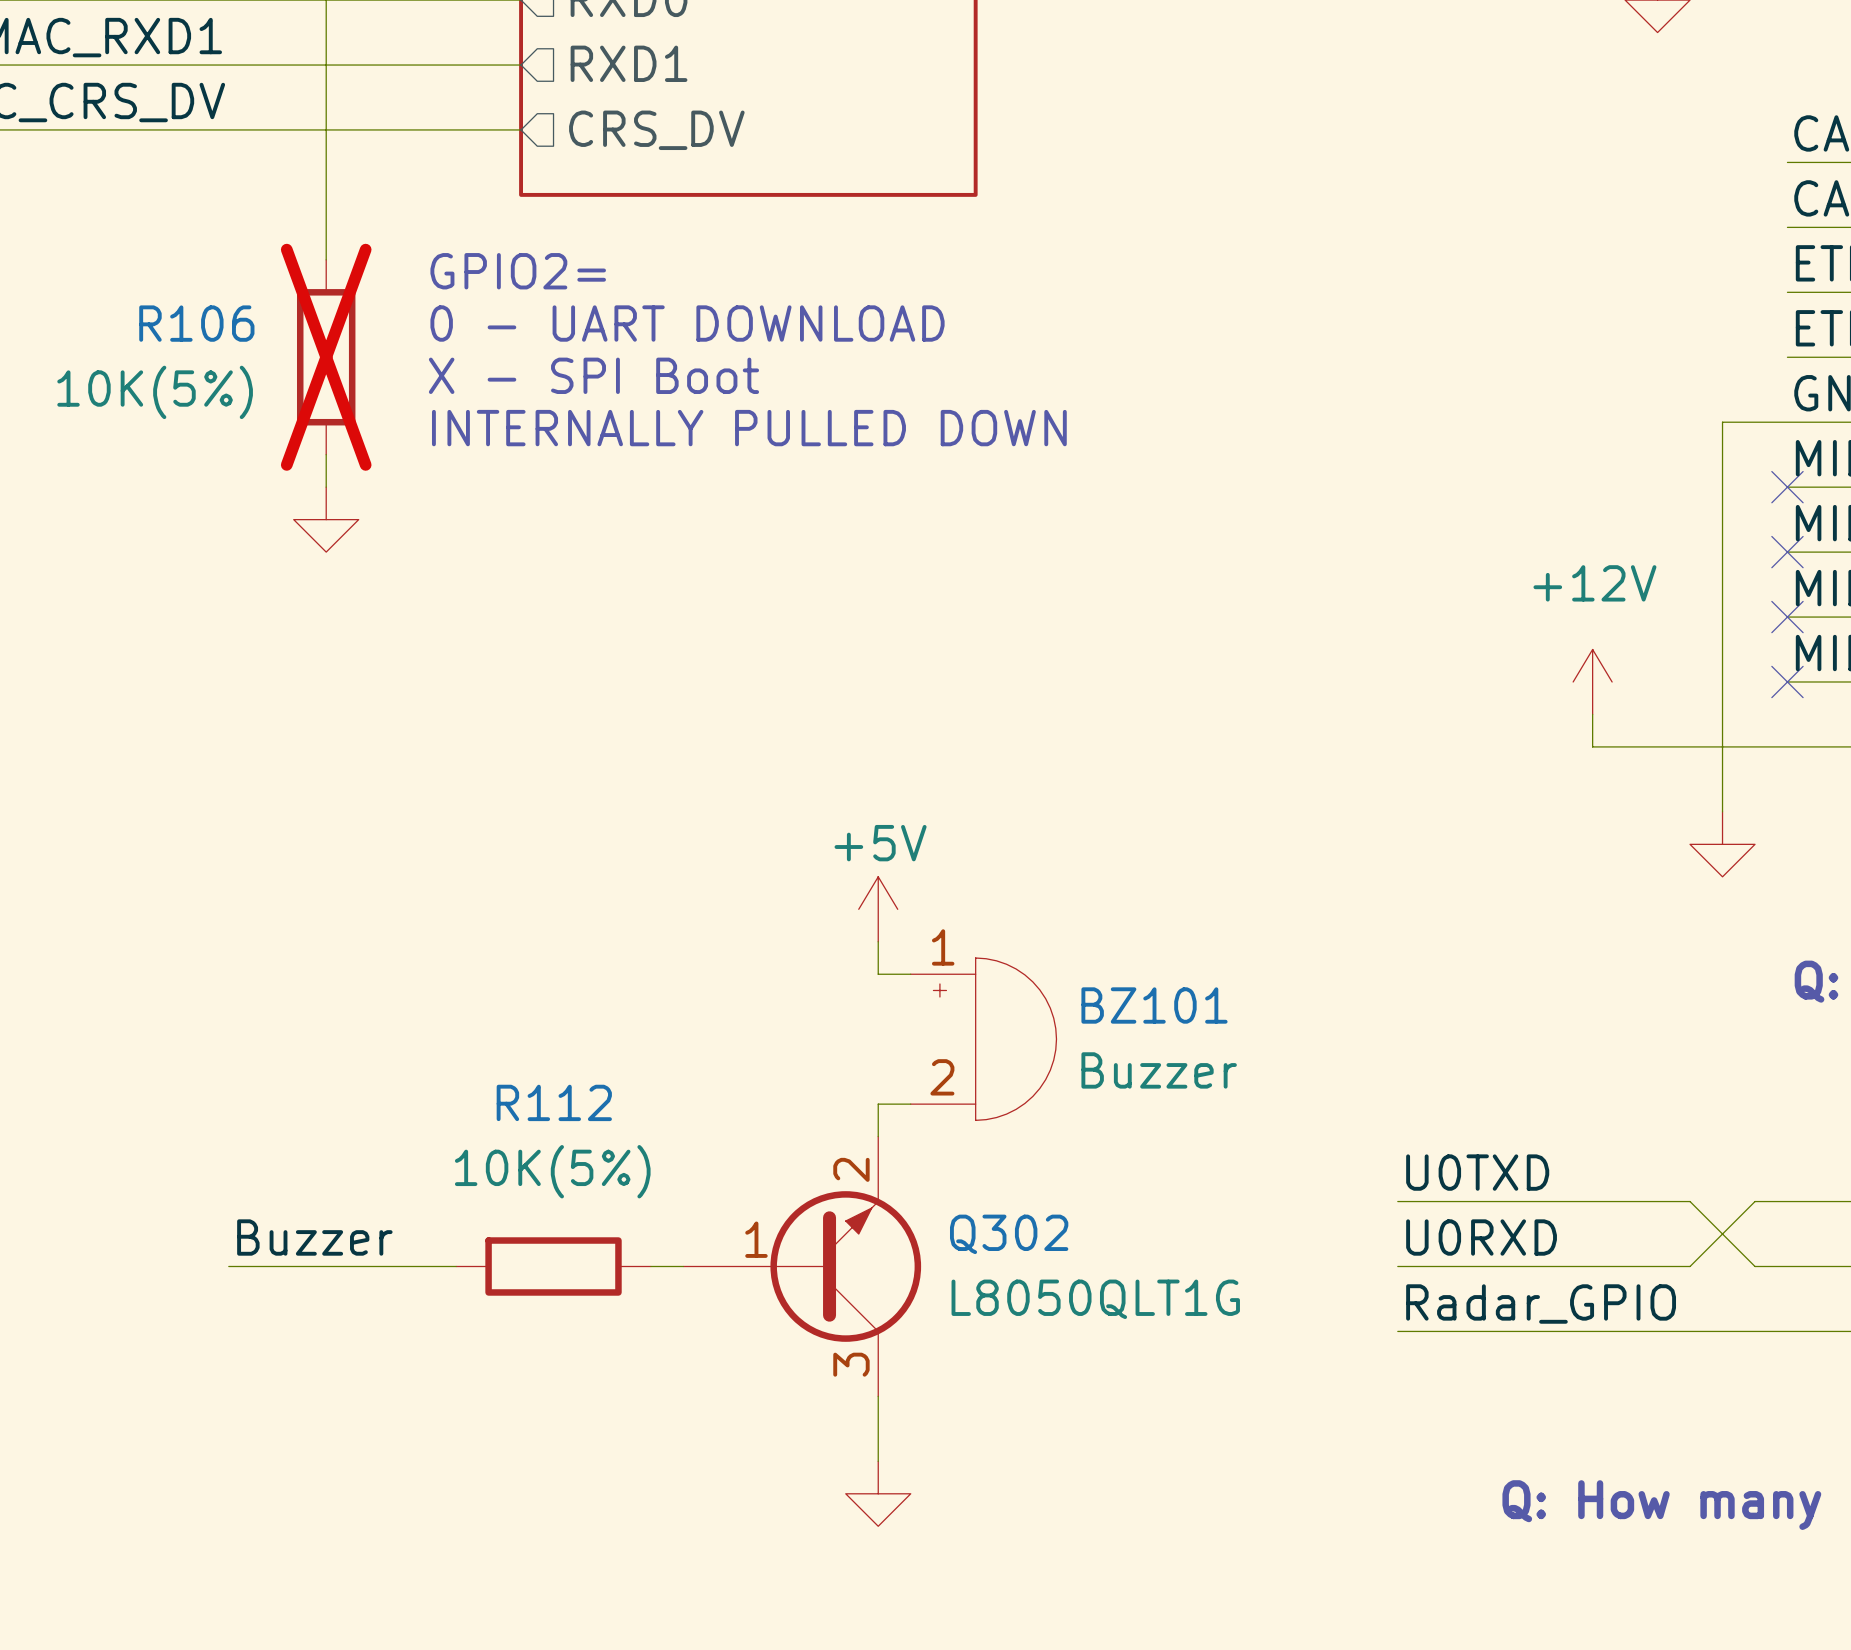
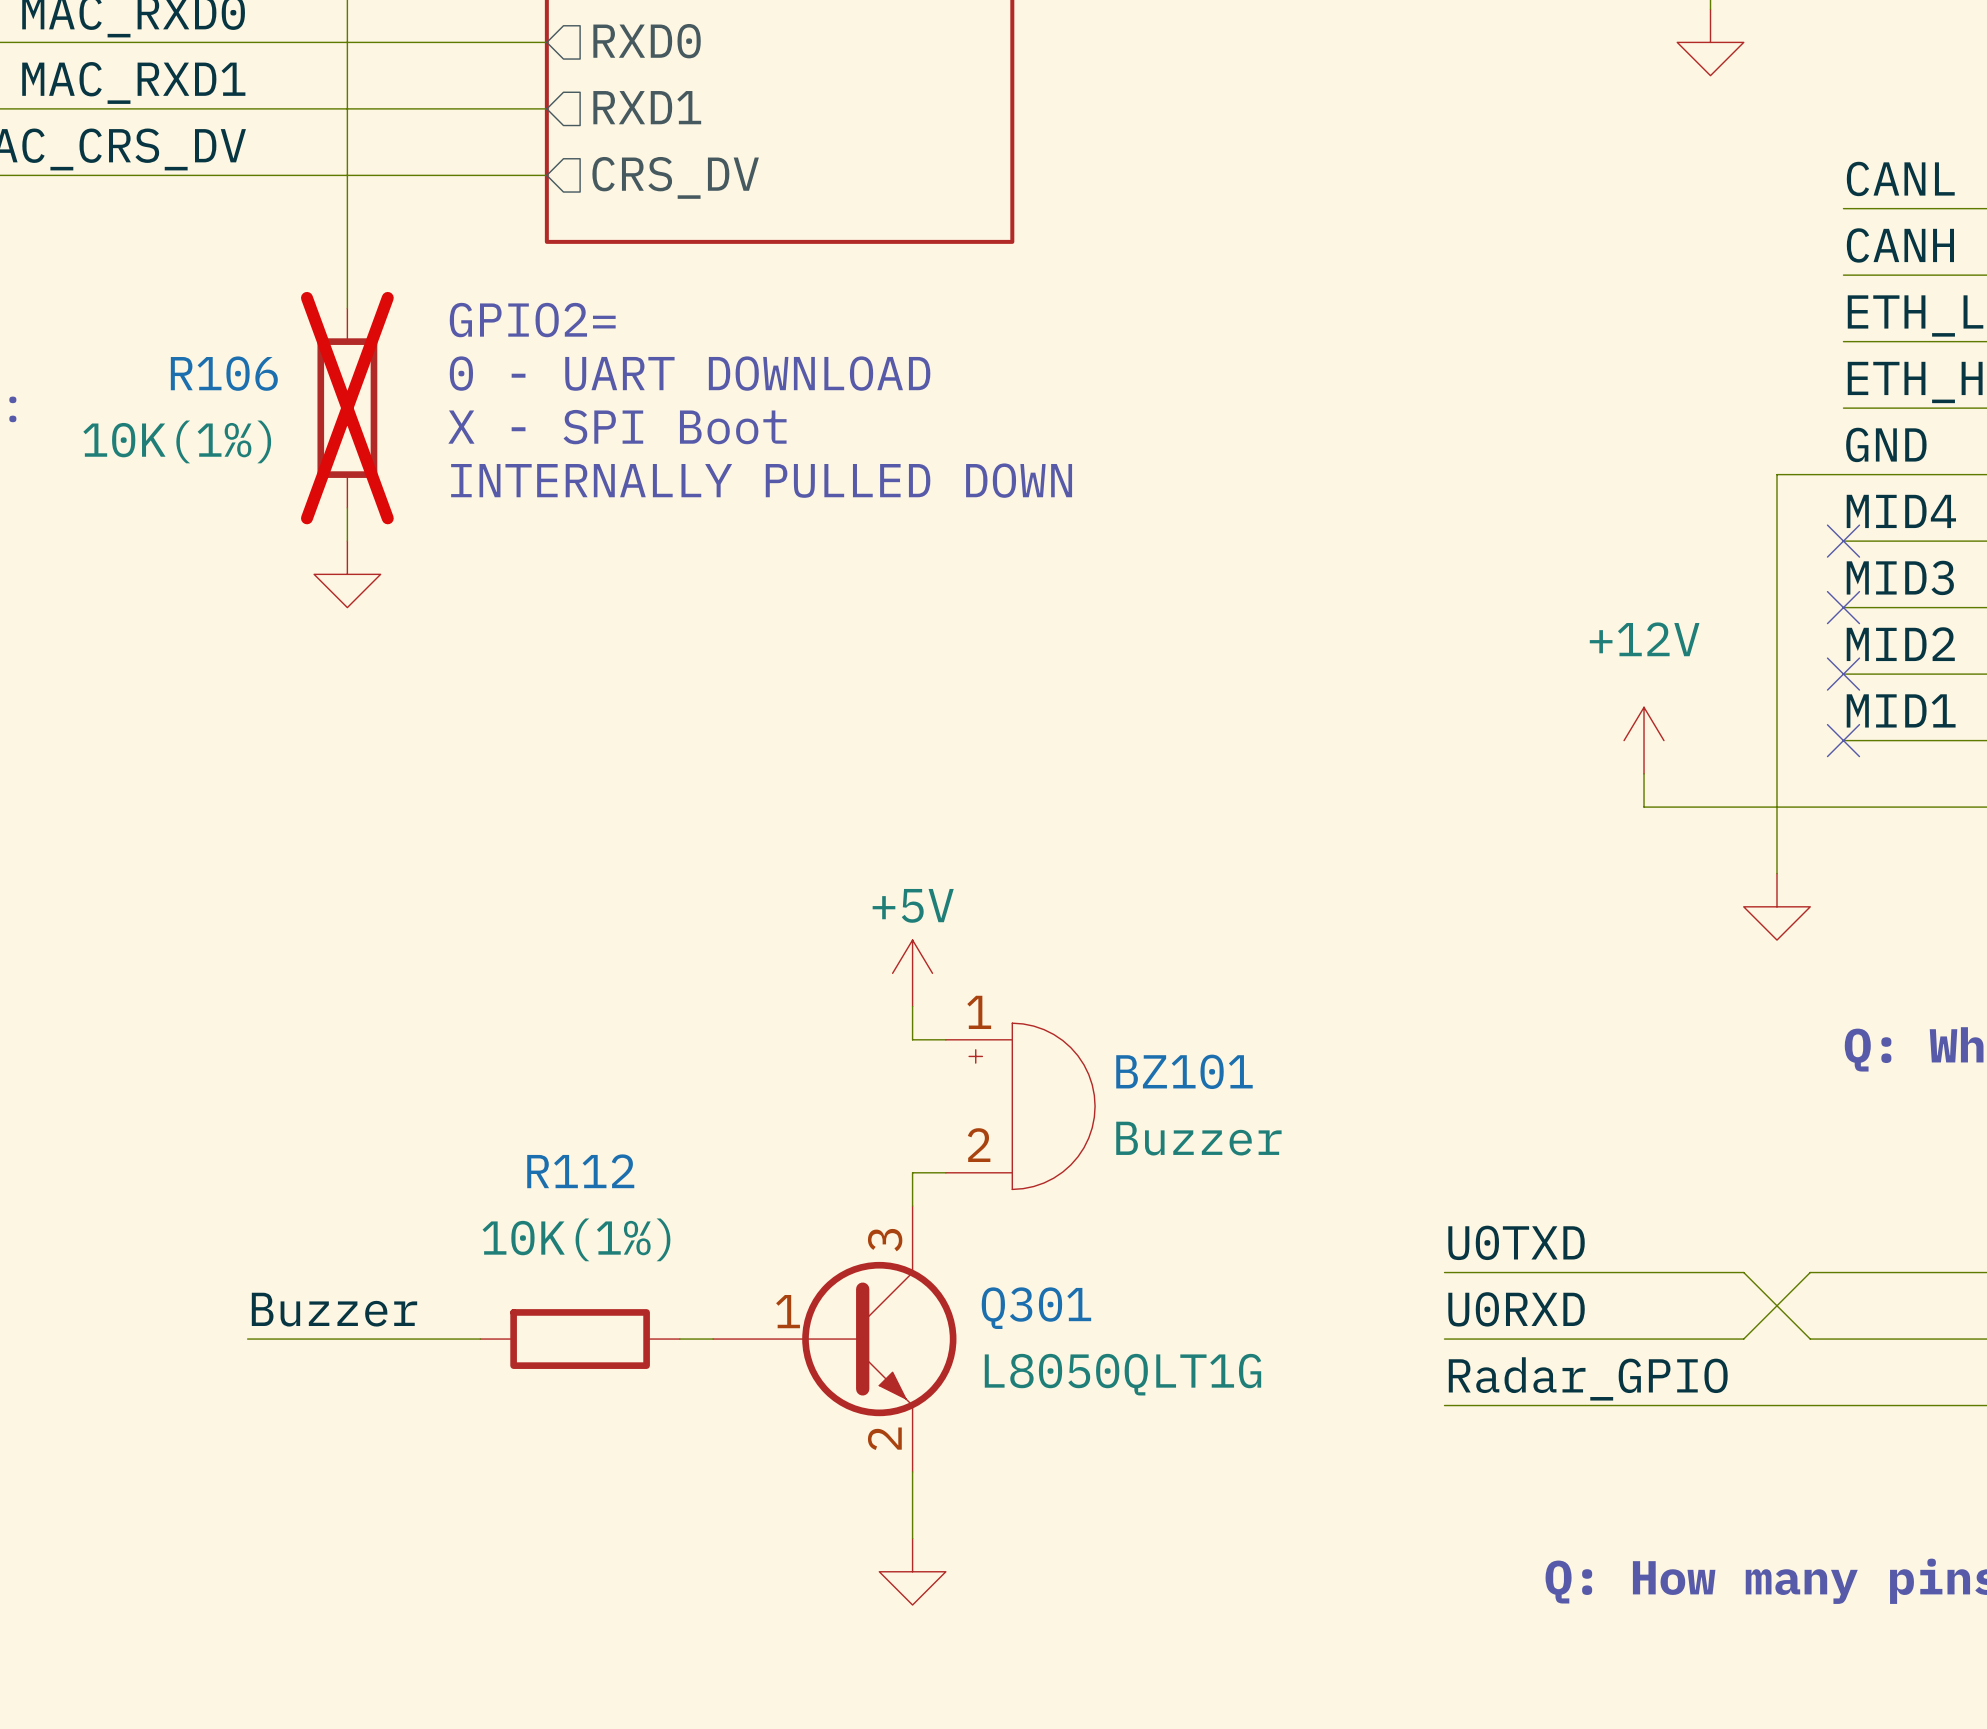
R106 value: 10K(5%) (155, 392) -> 10K(1%) (177, 441)
R112 value: 10K(5%) (552, 1171) -> 10K(1%) (576, 1239)
Q302: L8050QLT1G (802, 1266) -> none
Q301: none -> L8050QLT1G (834, 1339)

